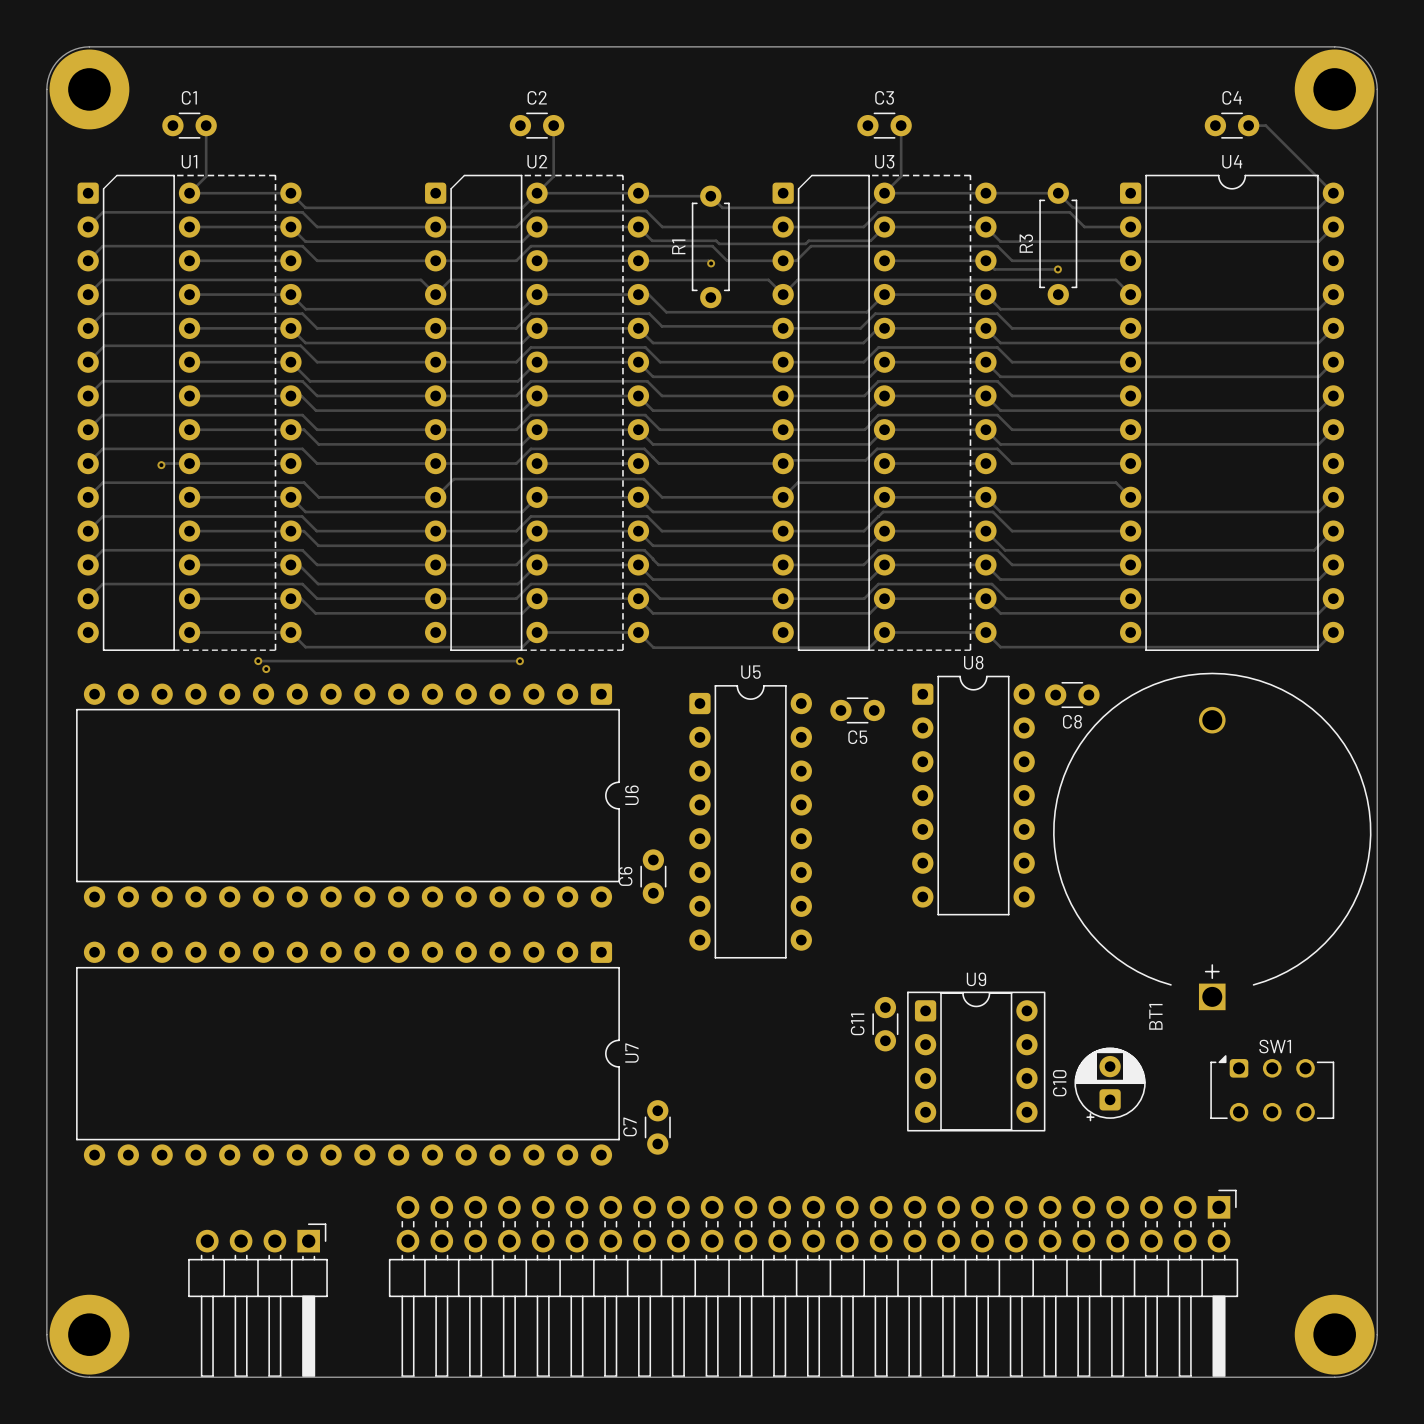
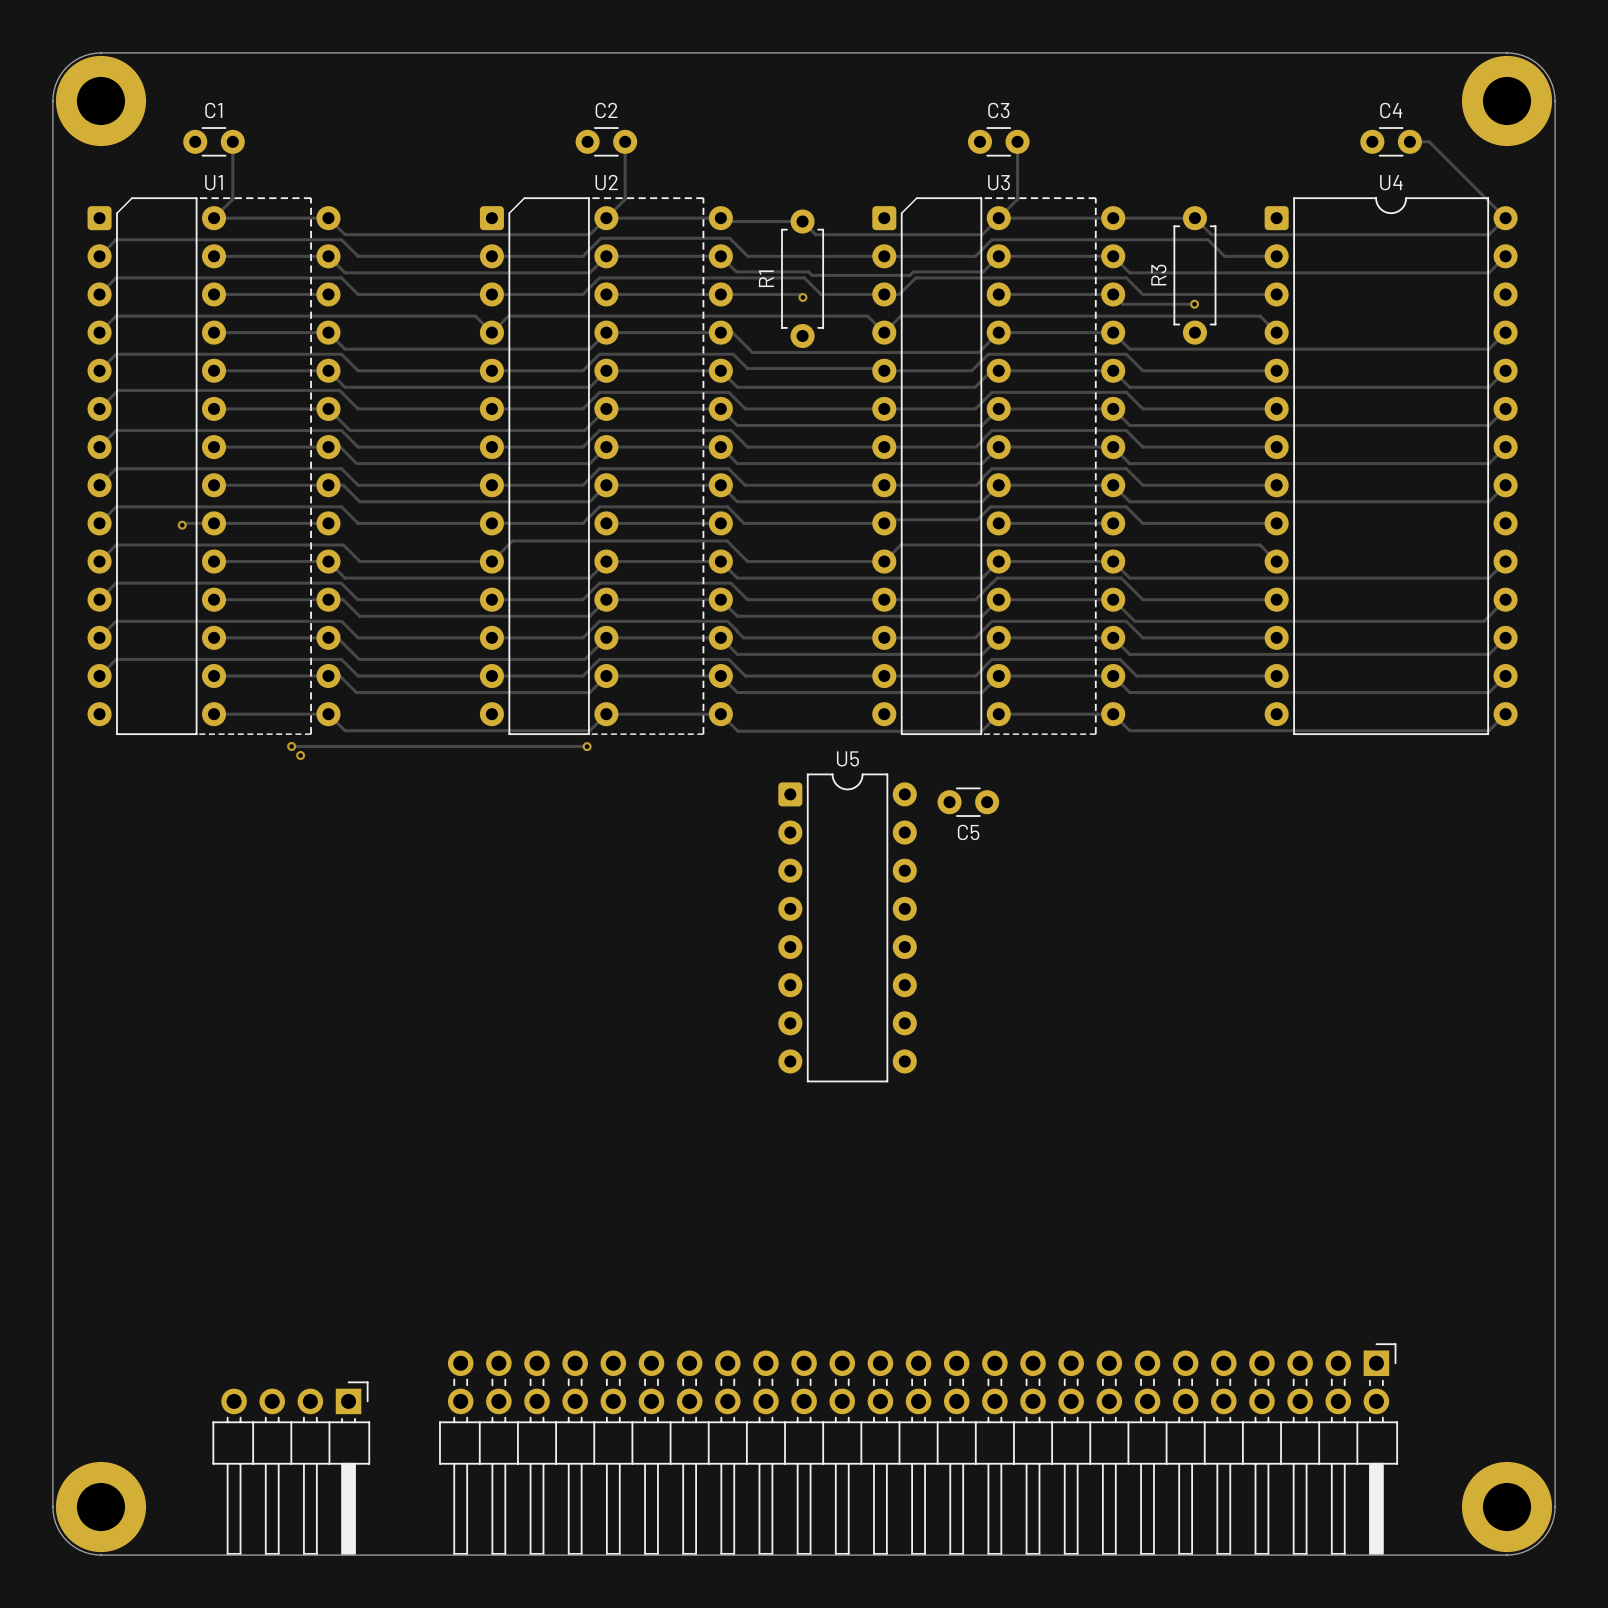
C8: (1072, 695) -> none
U6: (347, 795) -> none
U8: (973, 795) -> none
BT1: (1212, 841) -> none
C6: (653, 876) -> none
C11: (885, 1024) -> none
U7: (347, 1053) -> none
U9: (976, 1061) -> none
C10: (1110, 1084) -> none
SW1: (1272, 1088) -> none
C7: (657, 1127) -> none

